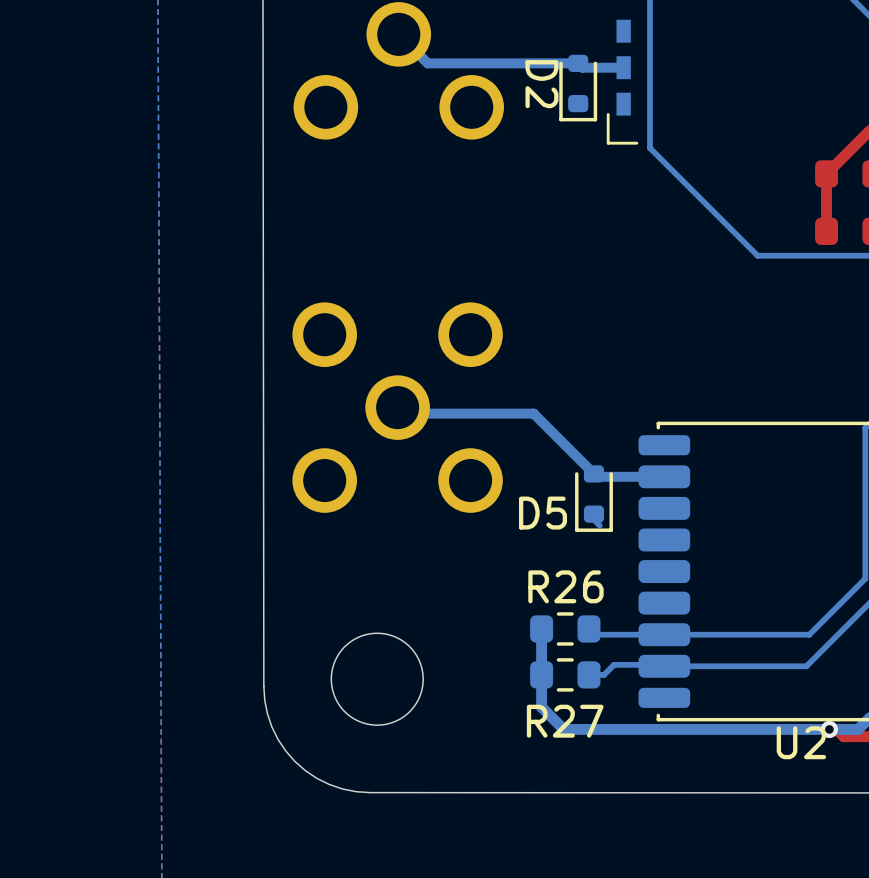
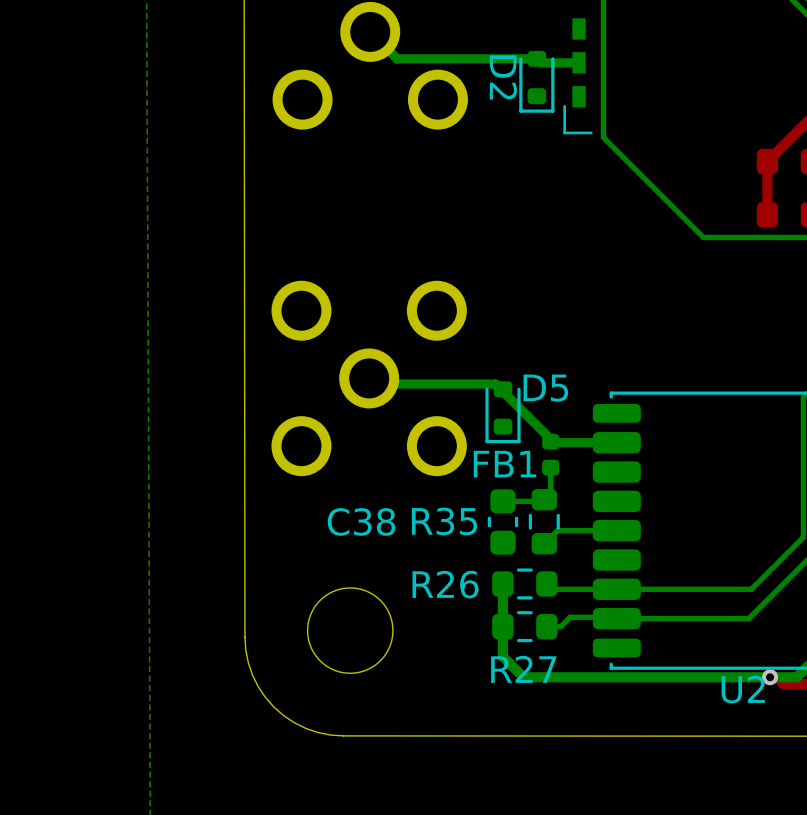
FB1: none -> (550, 454)
D5 position: (594, 498) -> (502, 412)
bottom track: none -> (550, 467) (550, 493) (542, 501) (502, 501)
D5 name position: D5 (543, 513) -> D5 (545, 388)
bottom track: (594, 519) (599, 525) -> none
R35: none -> (544, 521)
C38: none -> (502, 521)
bottom track: none -> (616, 530) (557, 530) (544, 543)
R26 name position: R26 (565, 586) -> R26 (445, 584)

